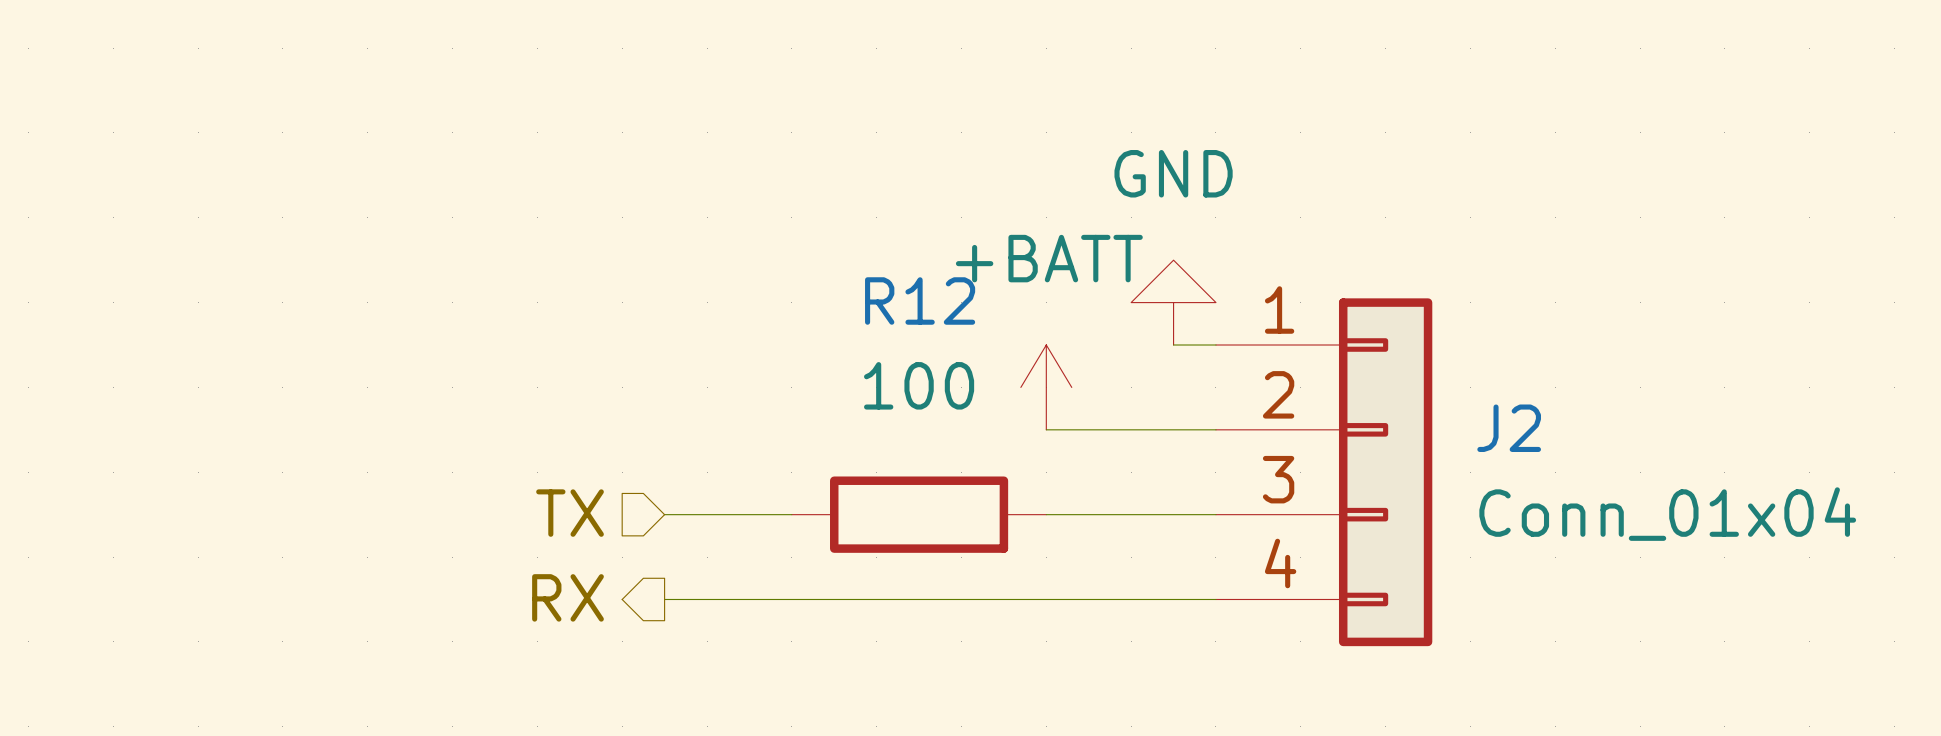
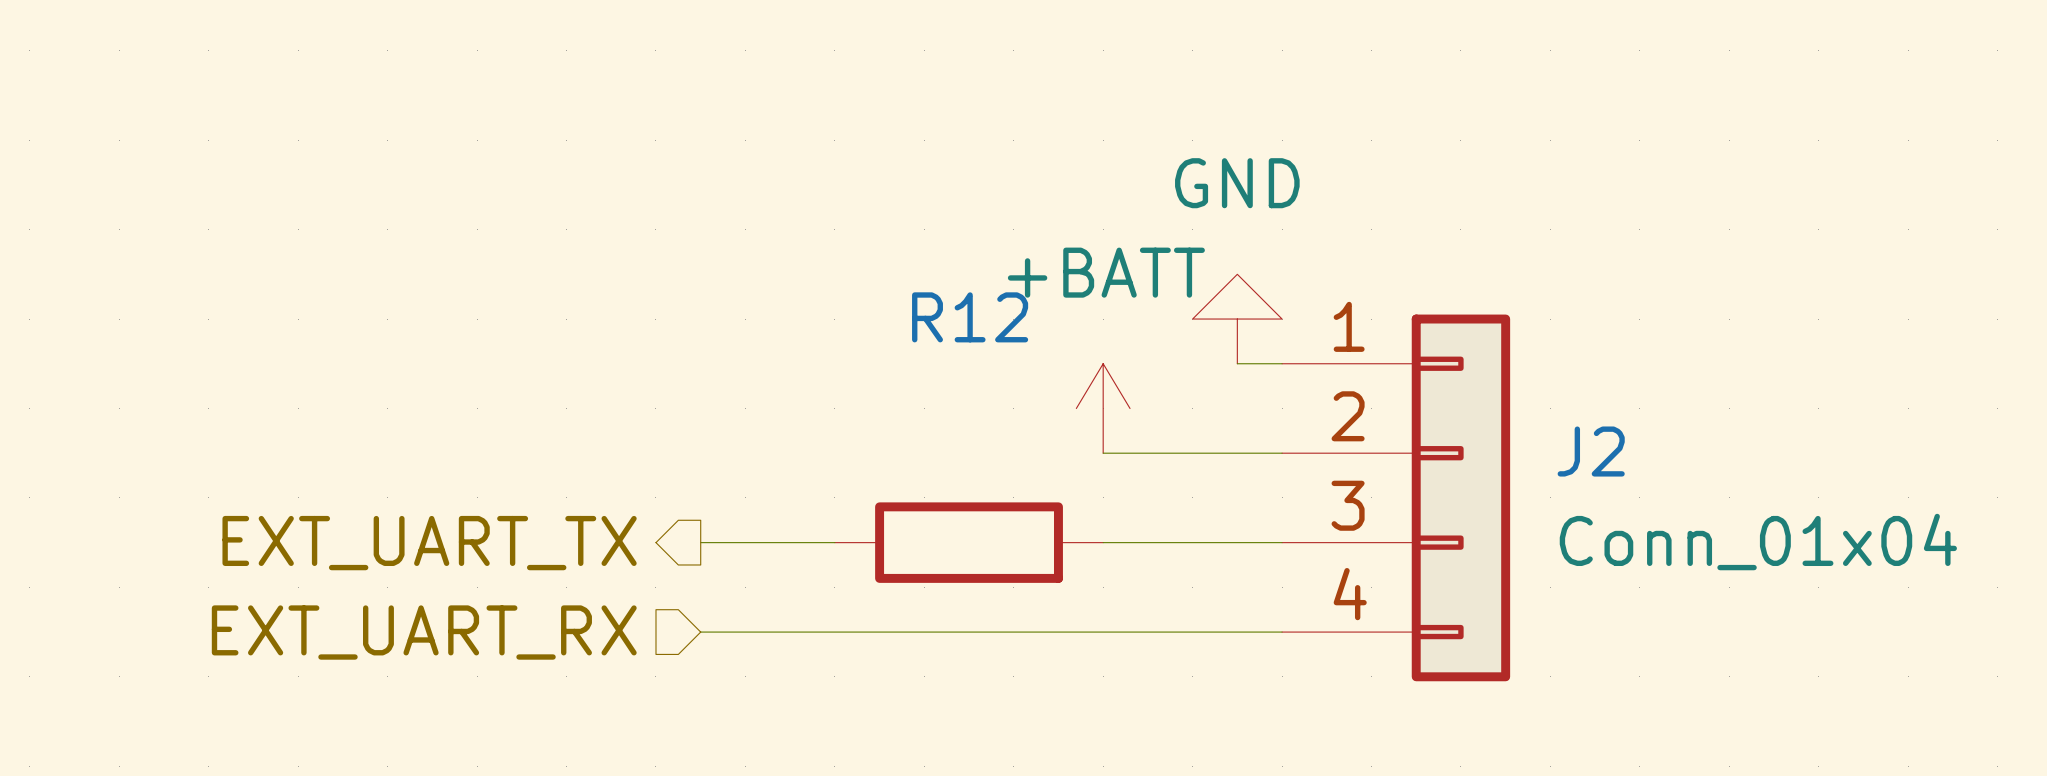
R12 value: 100 (919, 385) -> none
hierarchical label shape: input (570, 513) -> output (429, 543)
hierarchical label: TX (570, 513) -> EXT_UART_TX (429, 543)
hierarchical label shape: output (567, 597) -> input (424, 632)
hierarchical label: RX (567, 597) -> EXT_UART_RX (424, 632)

